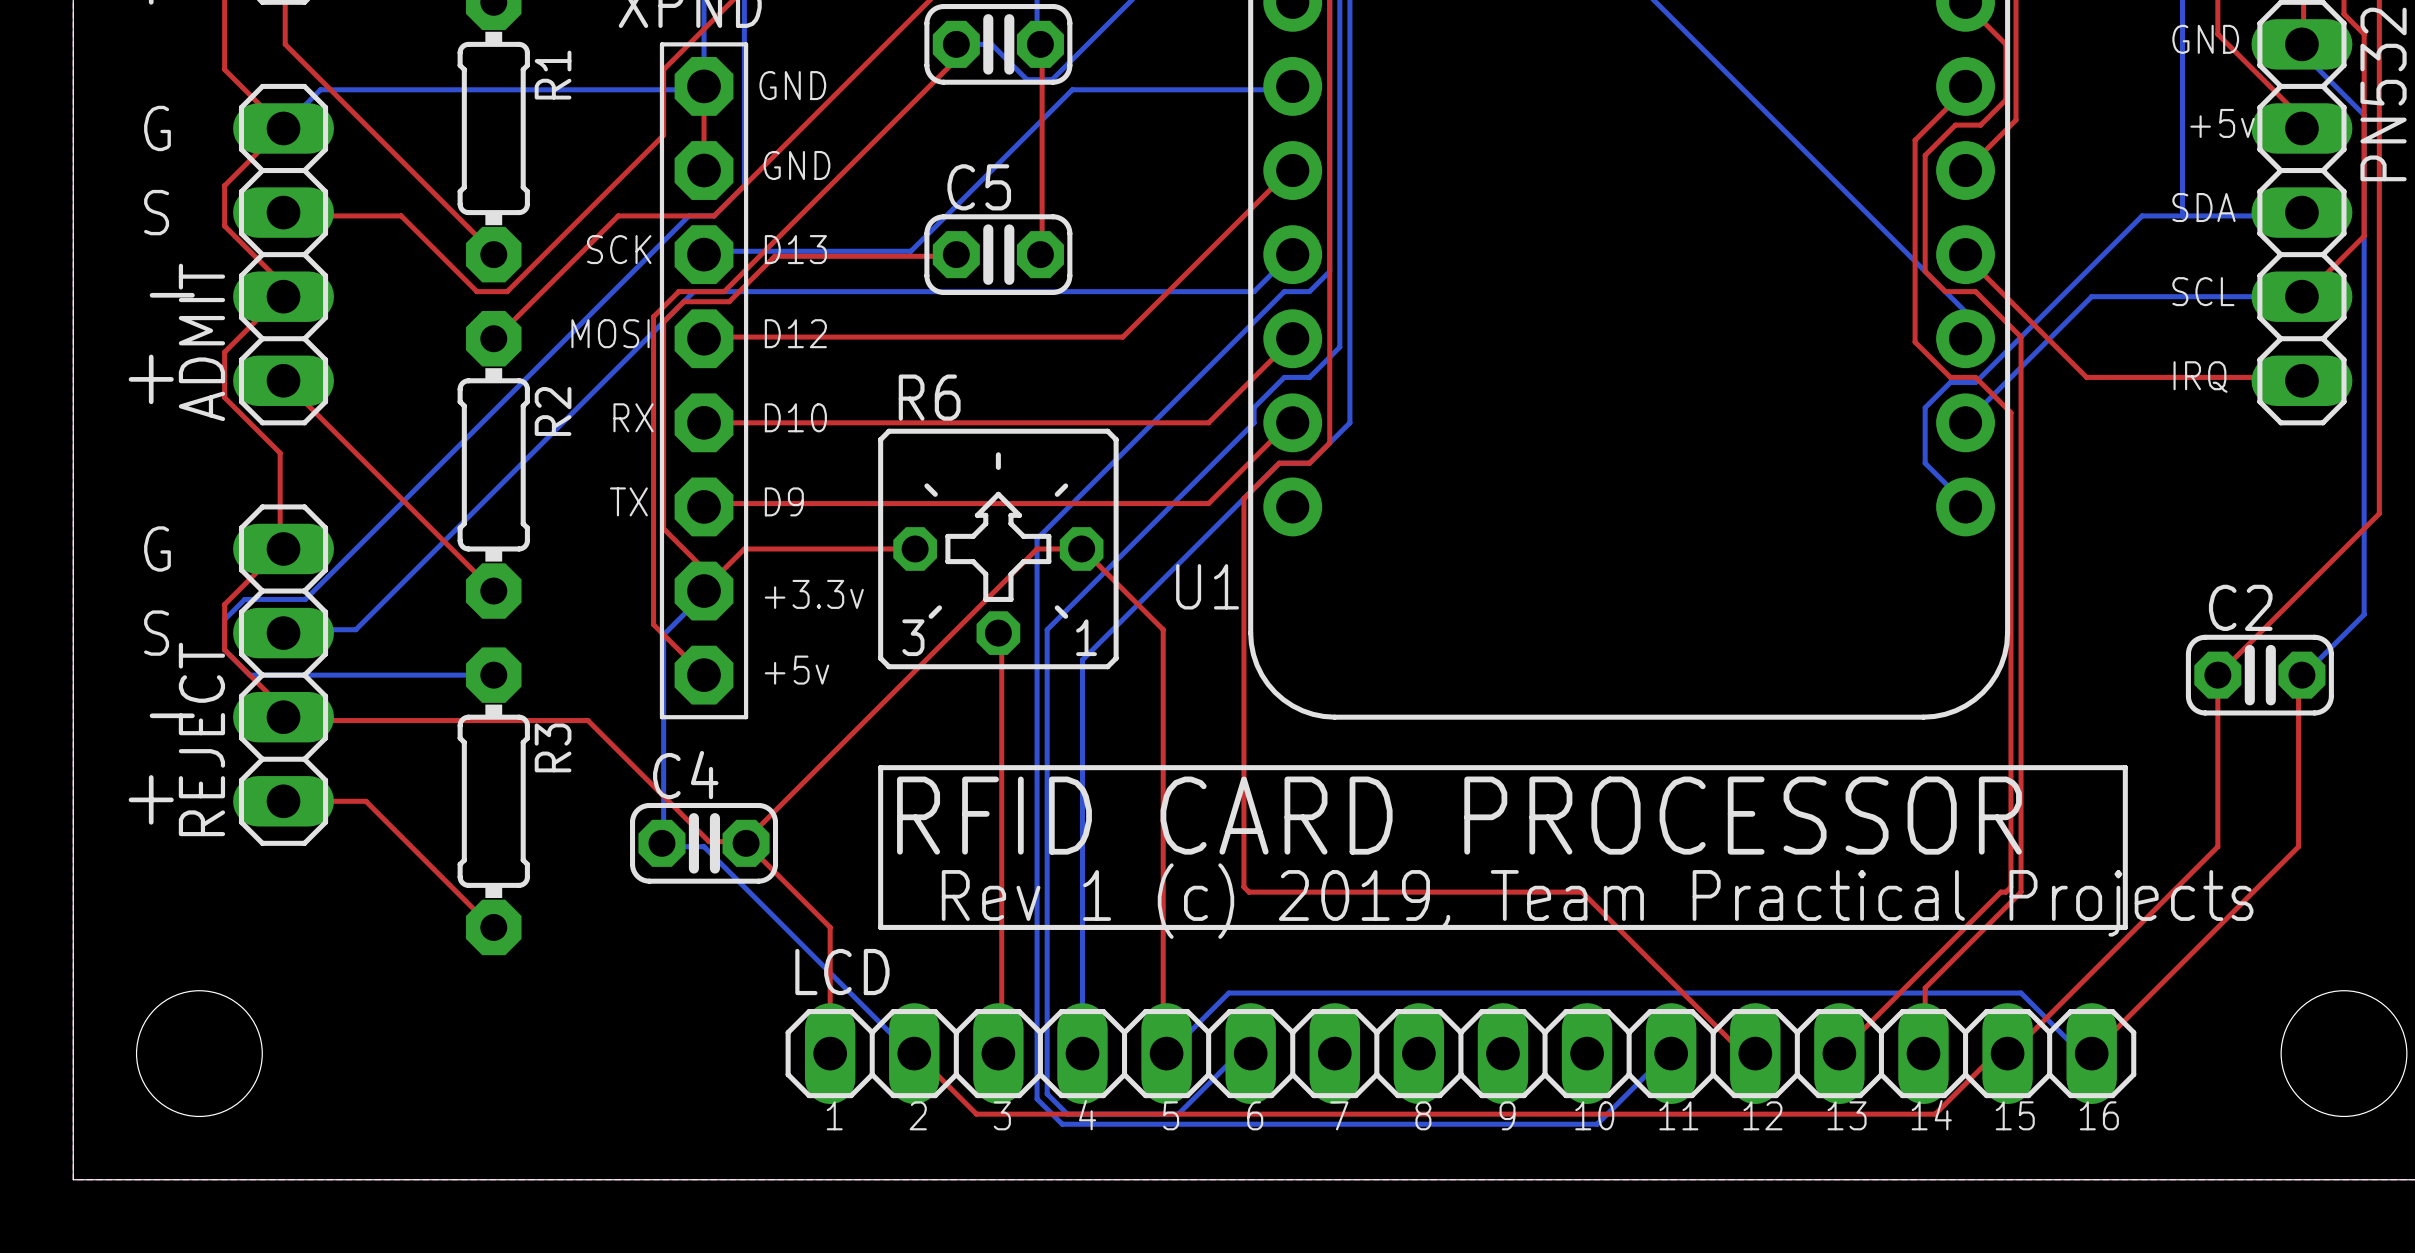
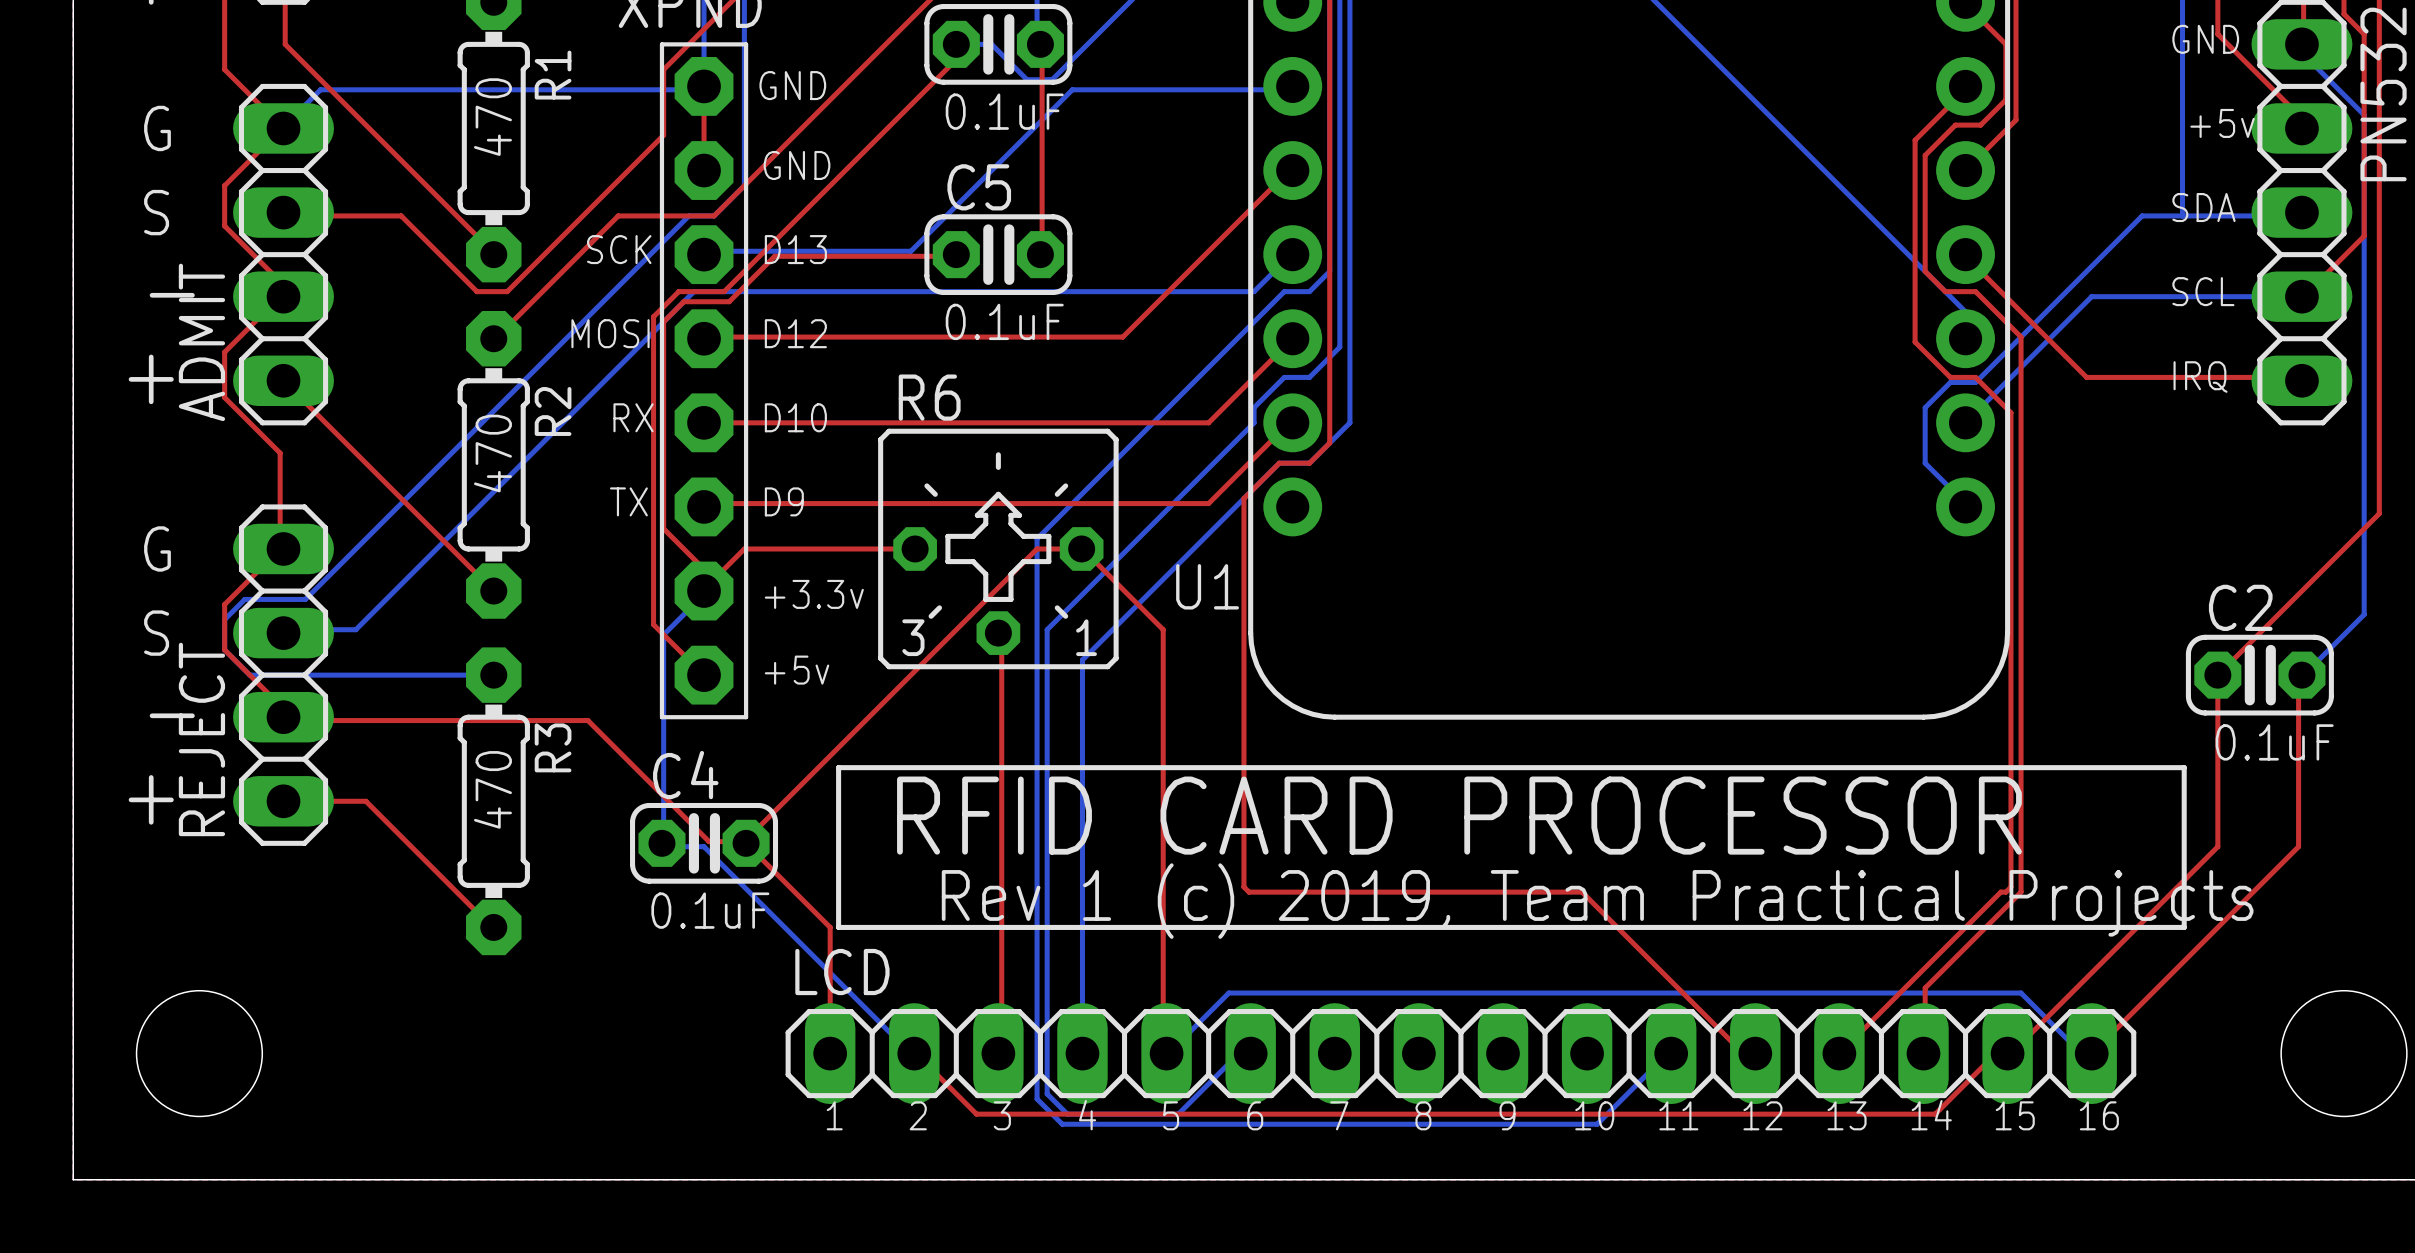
text: none -> 0.1uF (1004, 111)
text: none -> 470 (492, 117)
text: none -> 0.1uF (1004, 321)
text: none -> 470 (492, 453)
text: none -> 0.1uF (2274, 742)
line: (880, 767) (880, 927) -> (880, 767) (838, 767) (838, 927) (880, 927)
line: (2125, 767) (2125, 927) -> (2125, 767) (2184, 767) (2184, 927) (2125, 927)
text: none -> 470 (492, 789)
text: none -> 0.1uF (710, 910)

